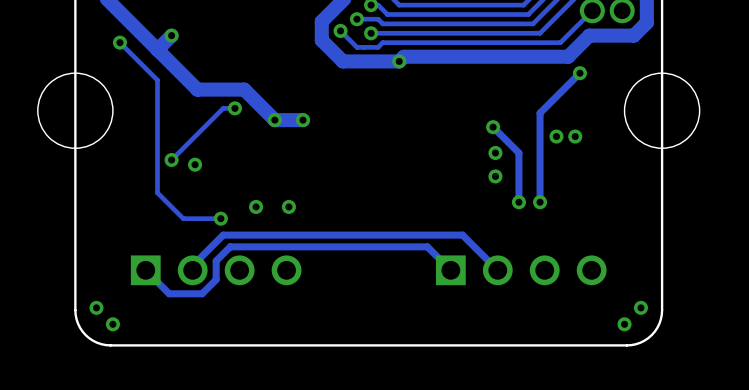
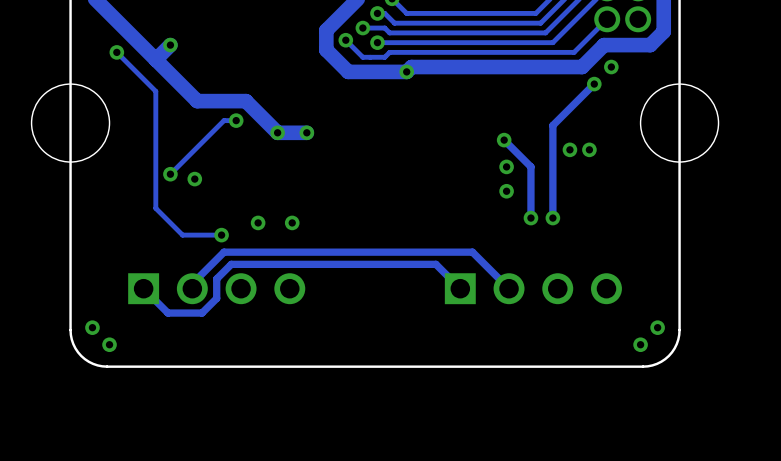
via: none -> (611, 67)

